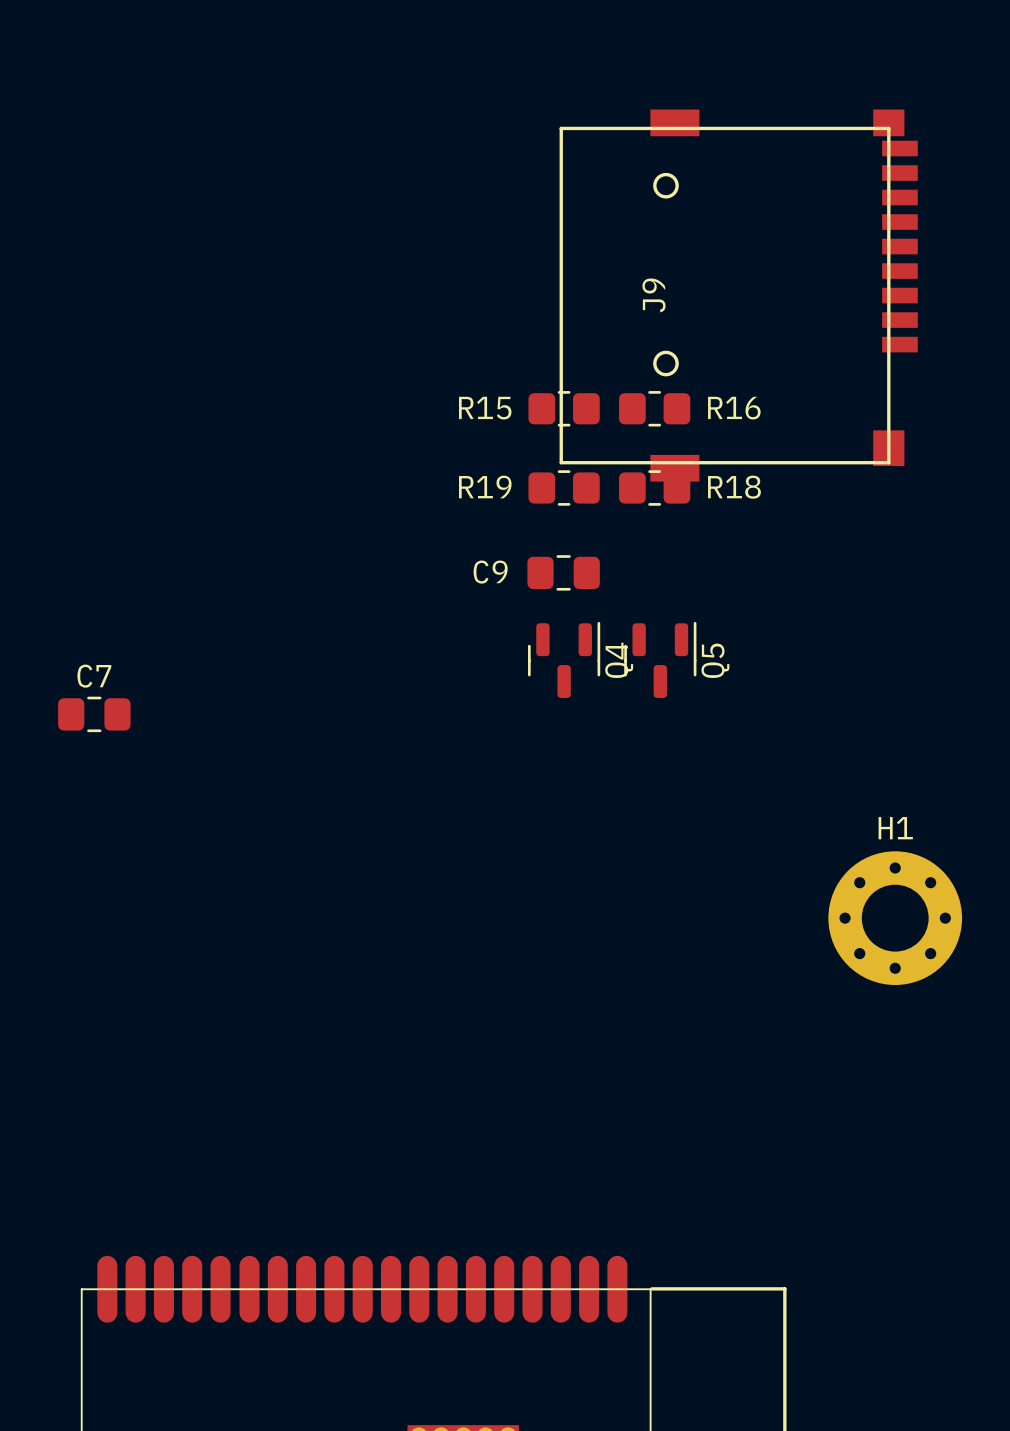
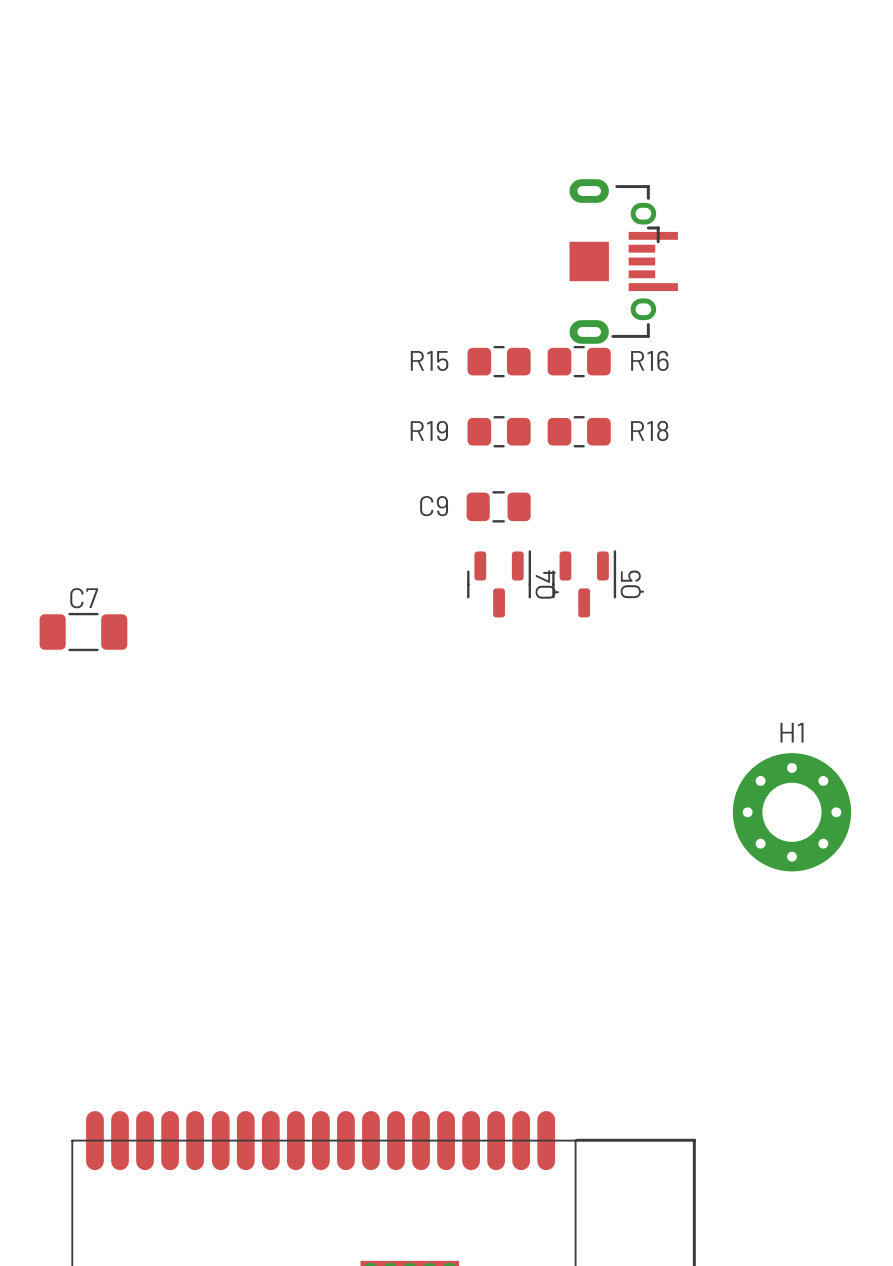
part: none -> (623, 261)
J9: (738, 295) -> none
C7 footprint: [58, 696, 131, 733] -> [39, 612, 128, 652]

